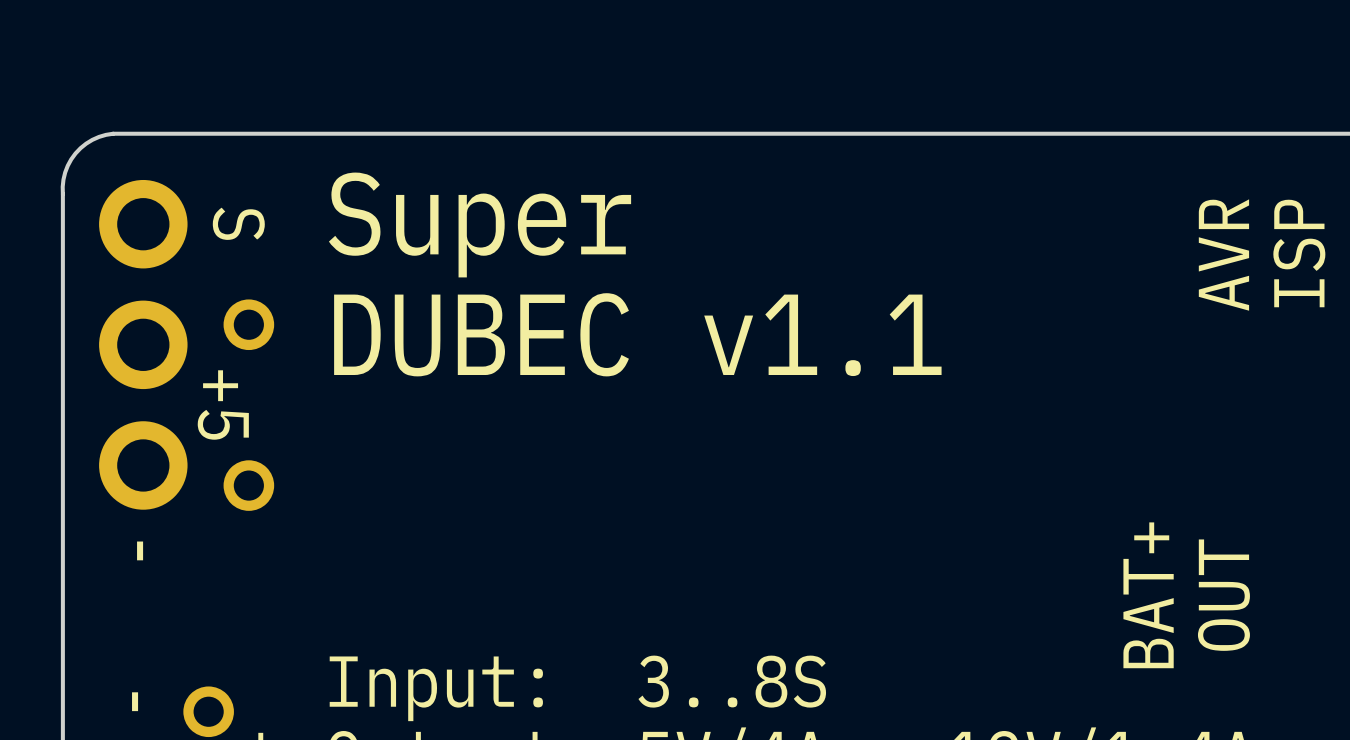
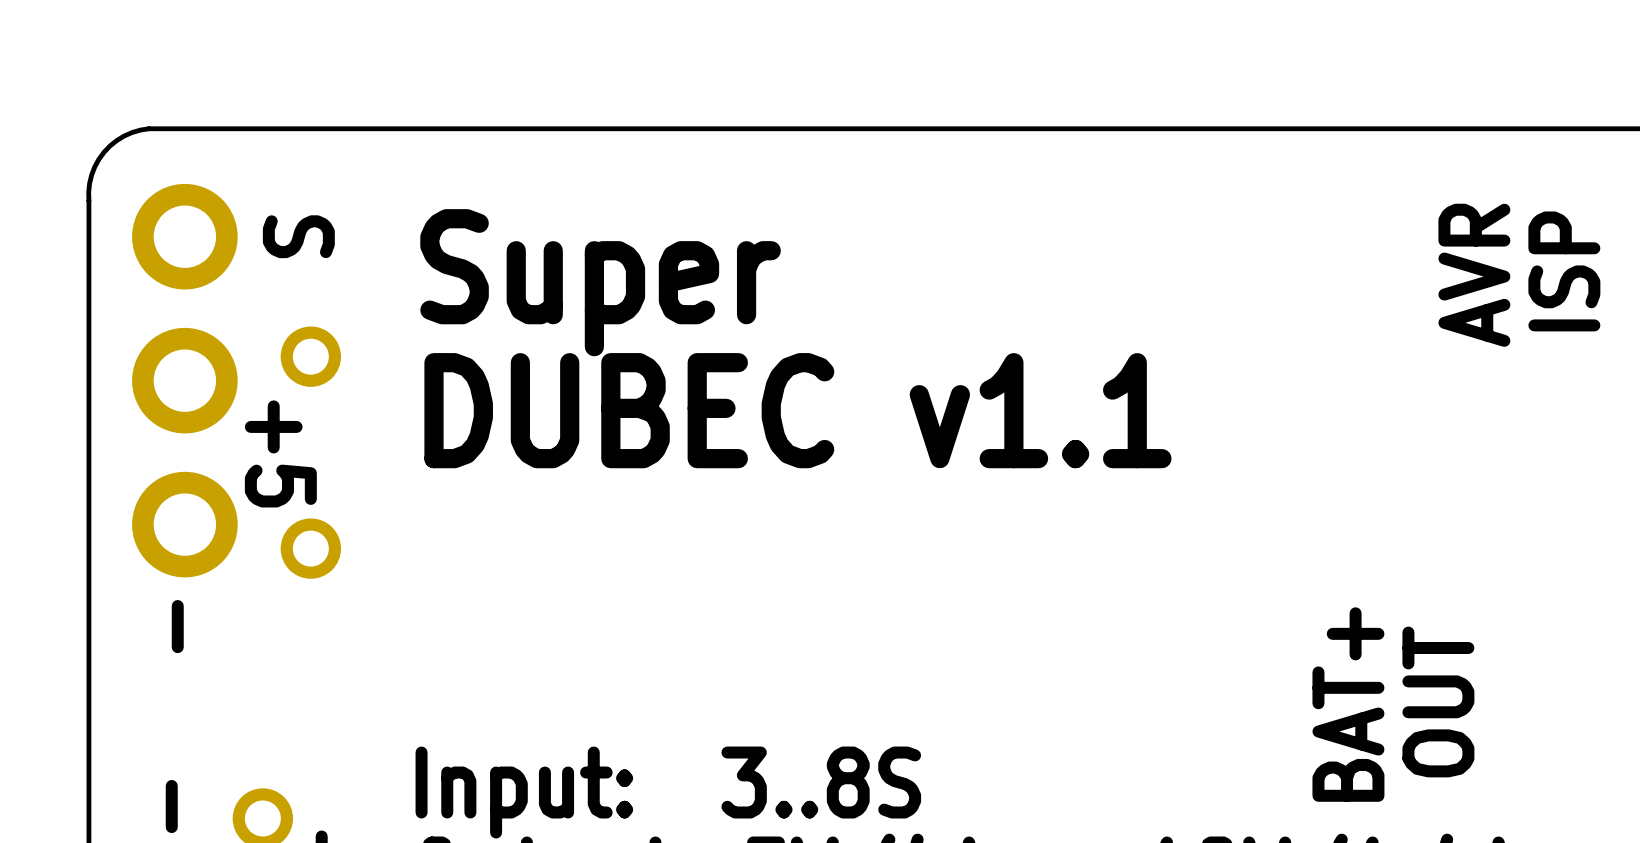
text position: Super (480, 224) -> Super (600, 282)
text position: DUBEC v1.1 (637, 334) -> DUBEC v1.1 (797, 410)
text position: BAT+ (1148, 595) -> BAT+ (1348, 704)
text position: OUT (1223, 595) -> OUT (1438, 701)

